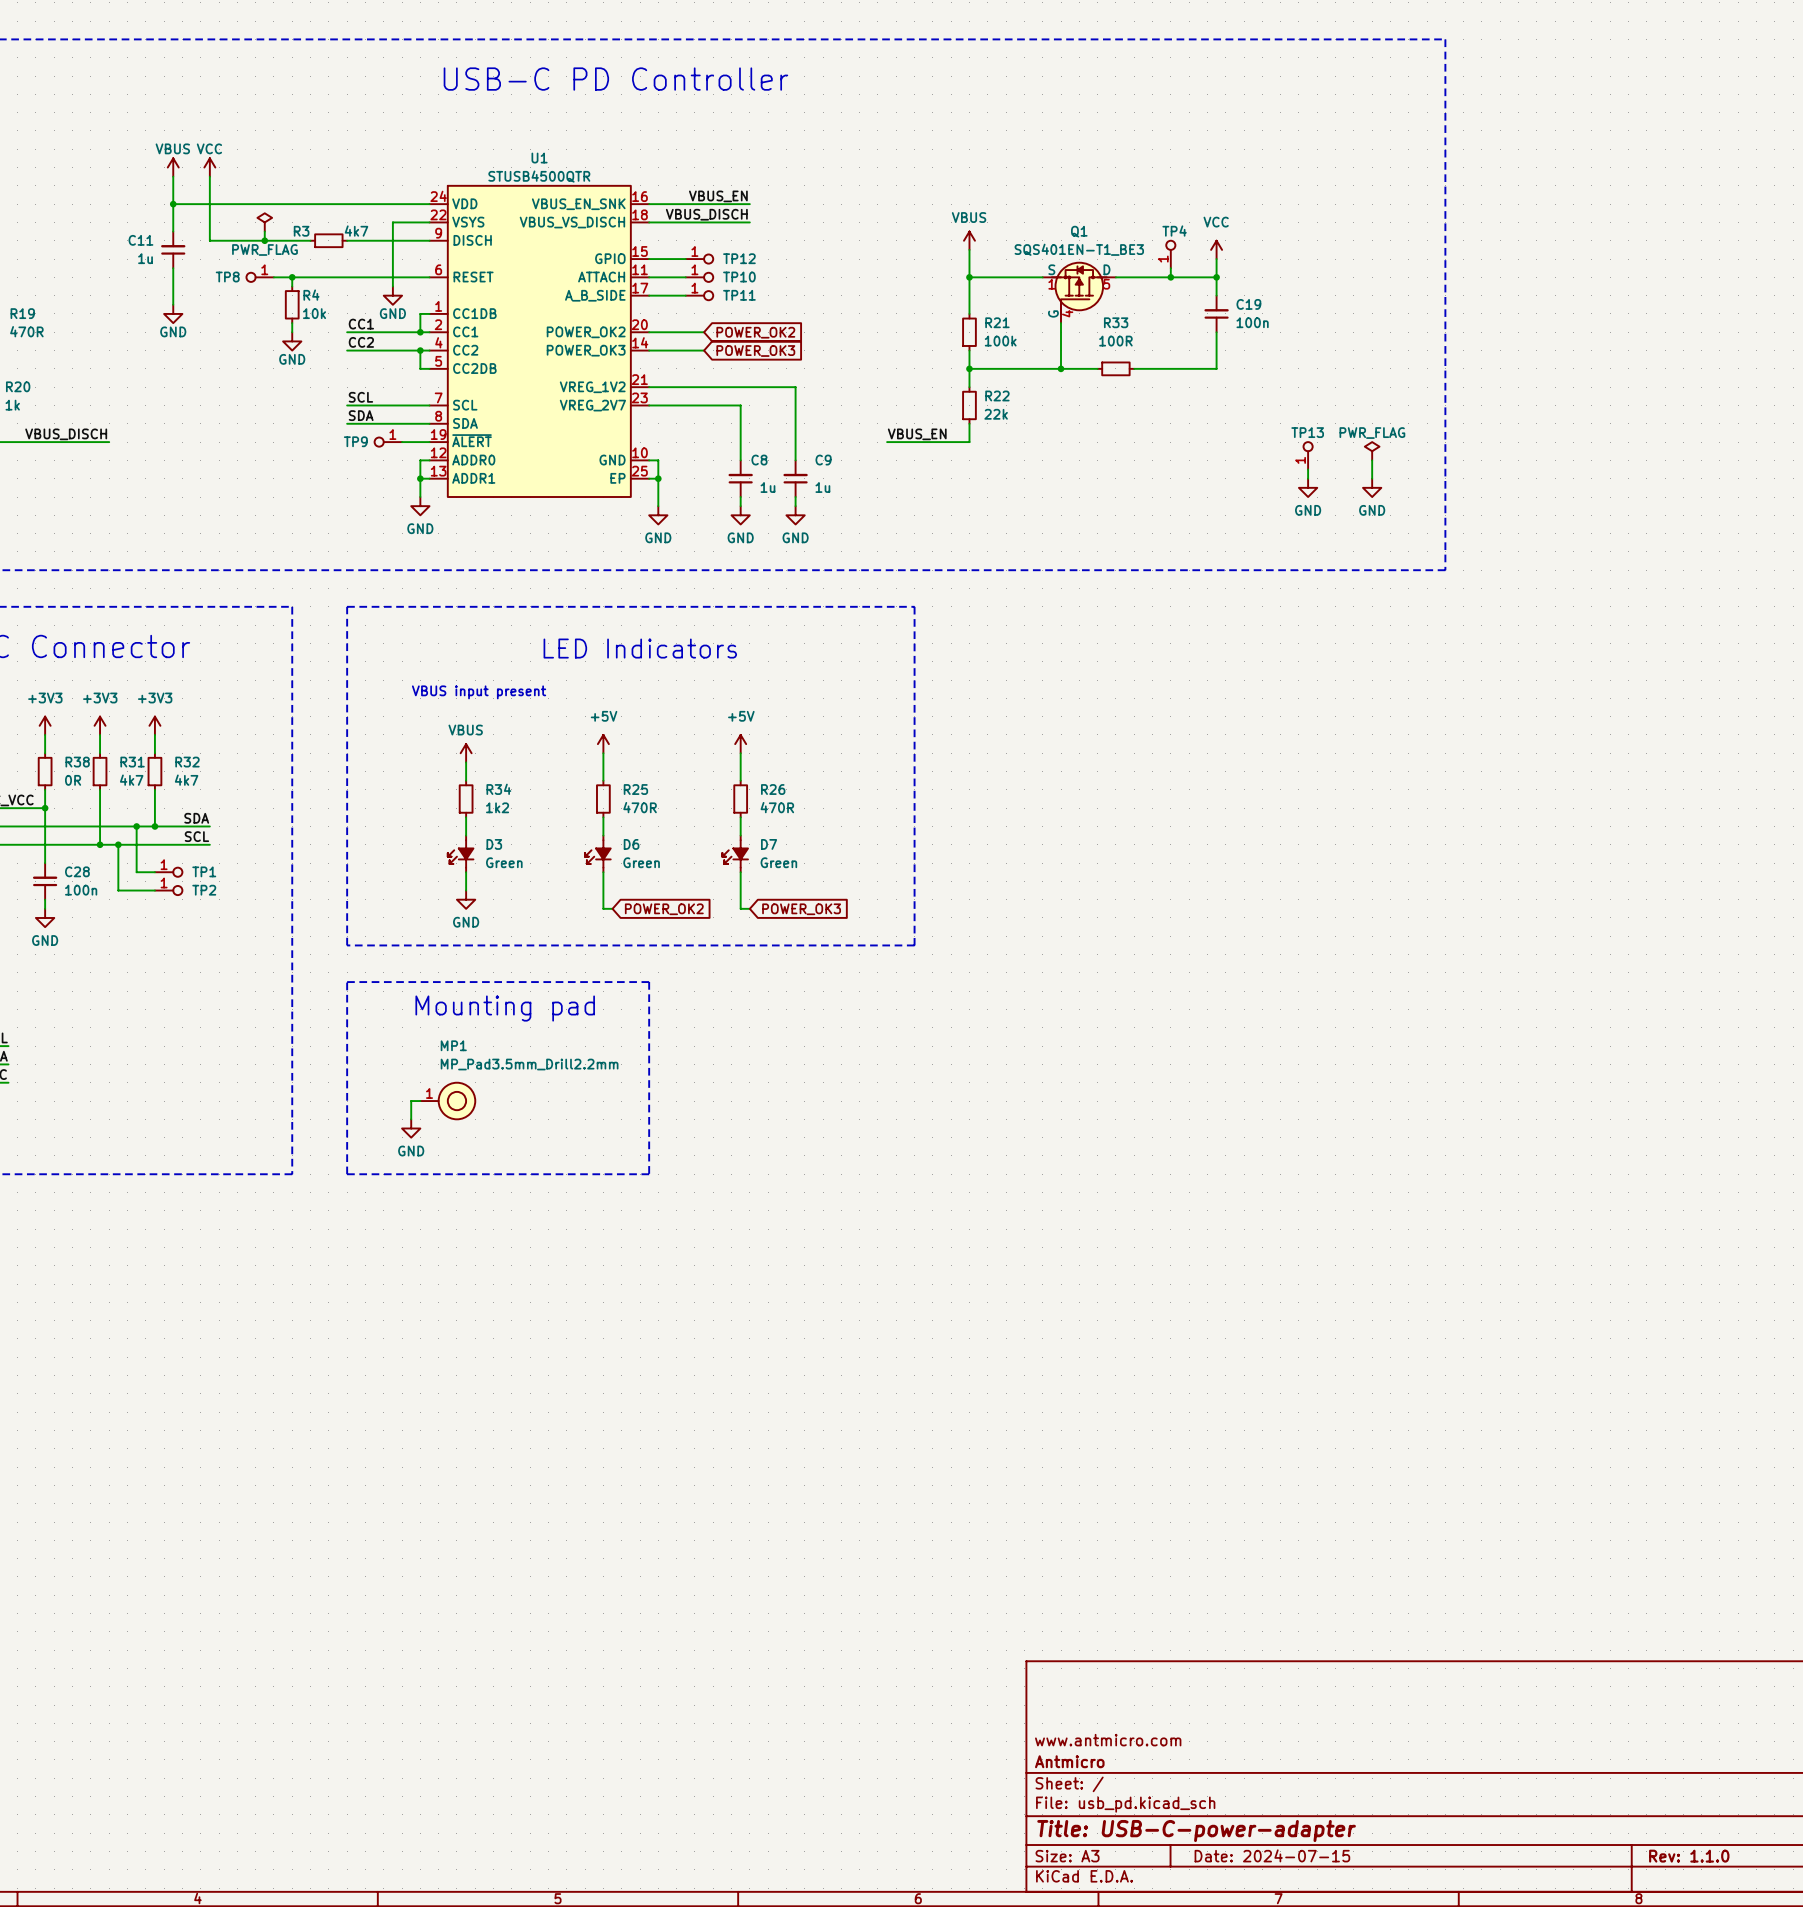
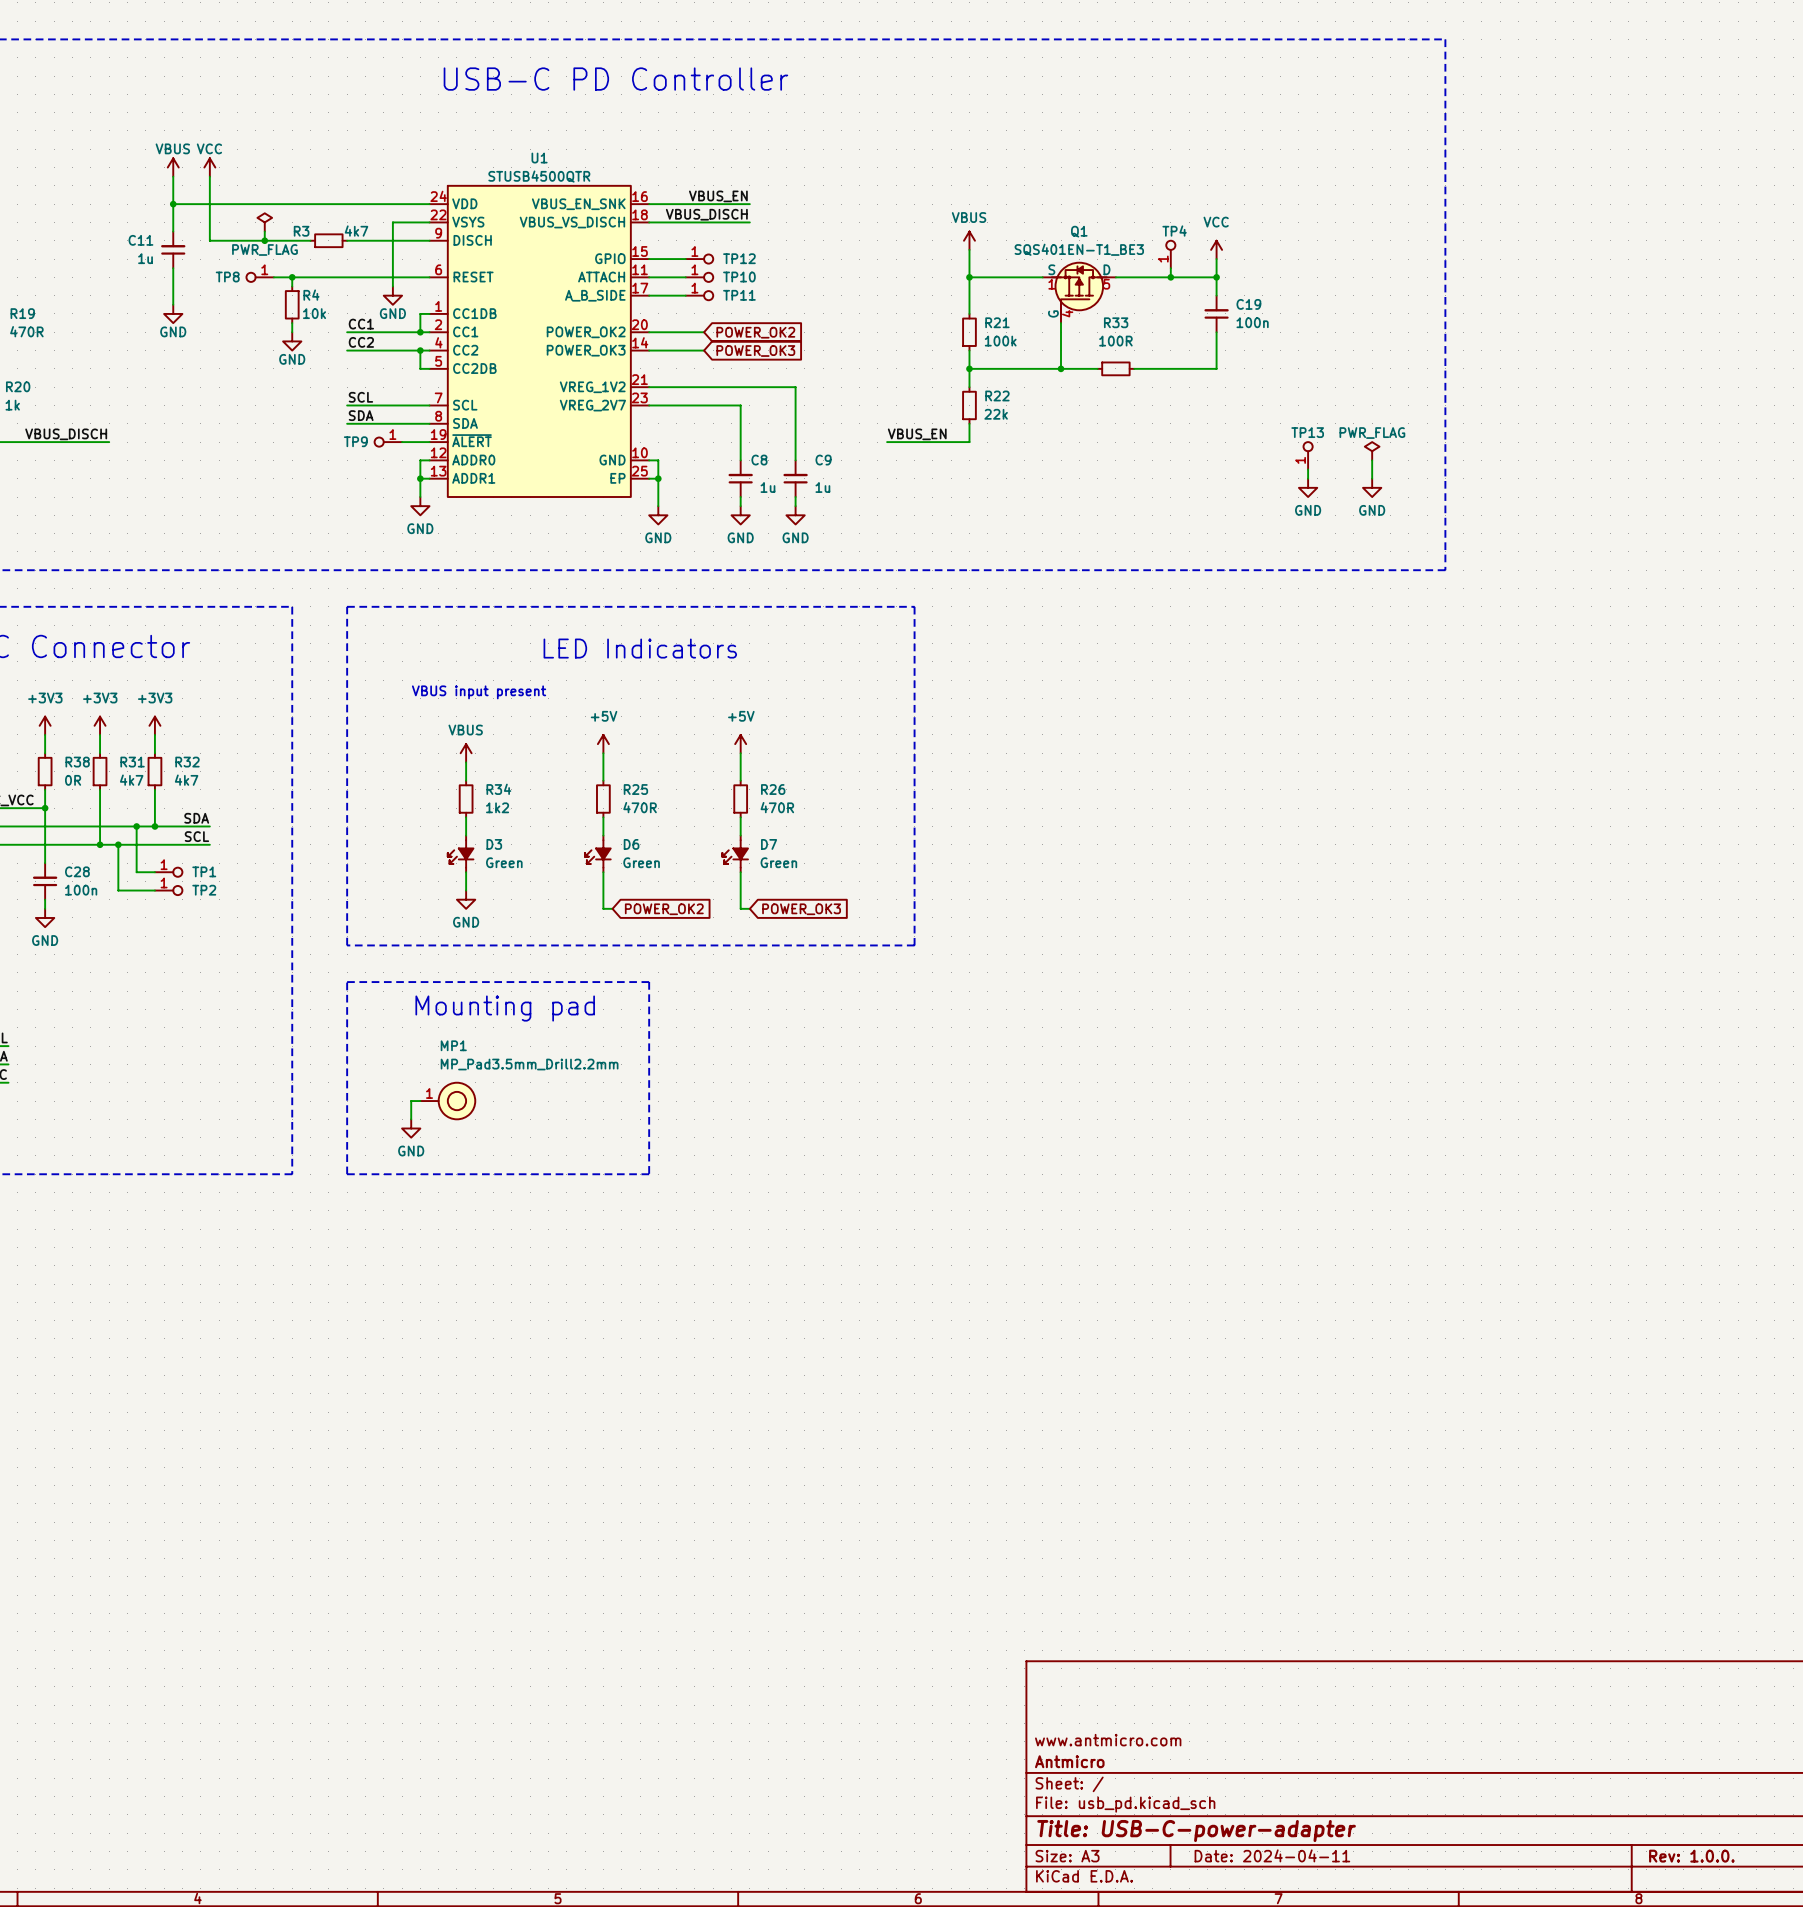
title block: Date: 2024-07-15 (1272, 1855) -> Date: 2024-04-11 (1272, 1855)
title block: Rev: 1.1.0 (1689, 1856) -> Rev: 1.0.0. (1691, 1856)

